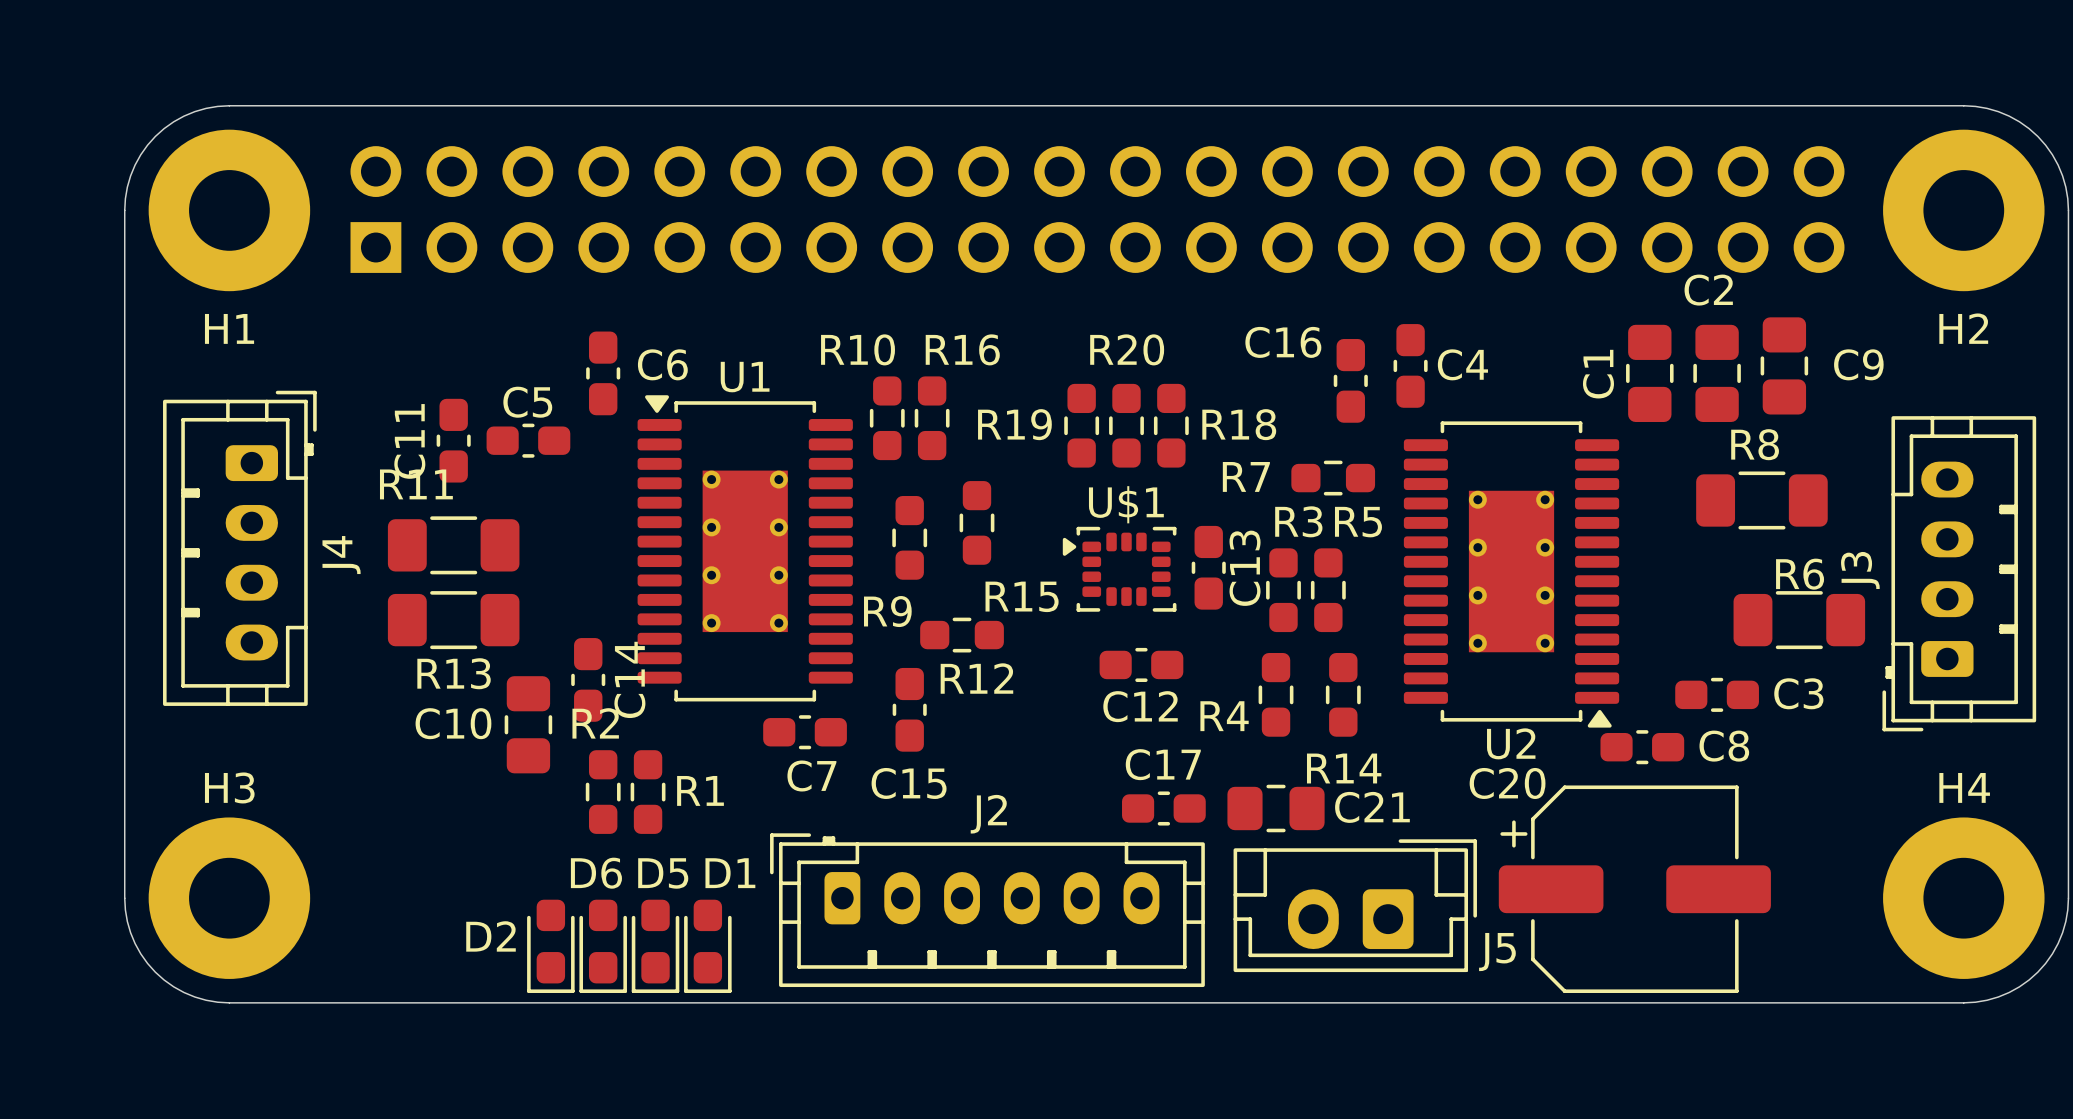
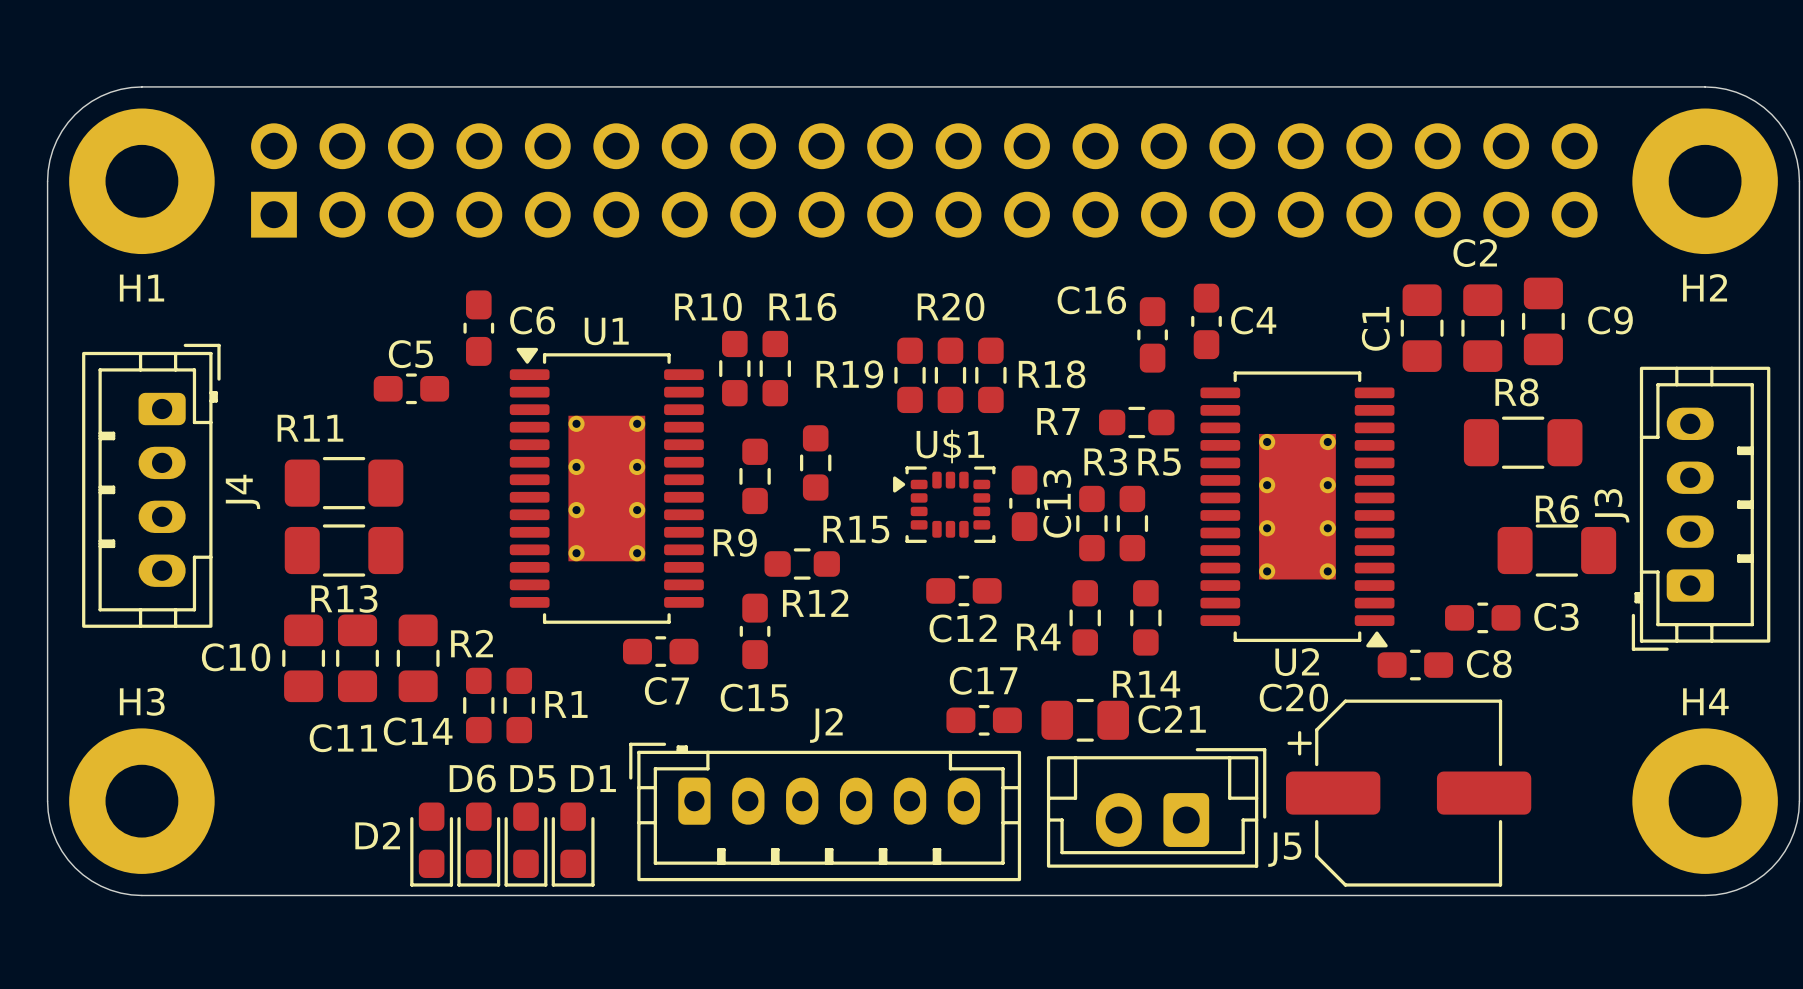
C11 footprint: [436, 398, 471, 483] -> [336, 614, 379, 703]
C11 name position: C11 (409, 441) -> C11 (343, 738)
C14 footprint: [571, 638, 606, 722] -> [396, 614, 440, 703]
C14 name position: C14 (629, 679) -> C14 (418, 731)
C10 position: (528, 724) -> (303, 658)

